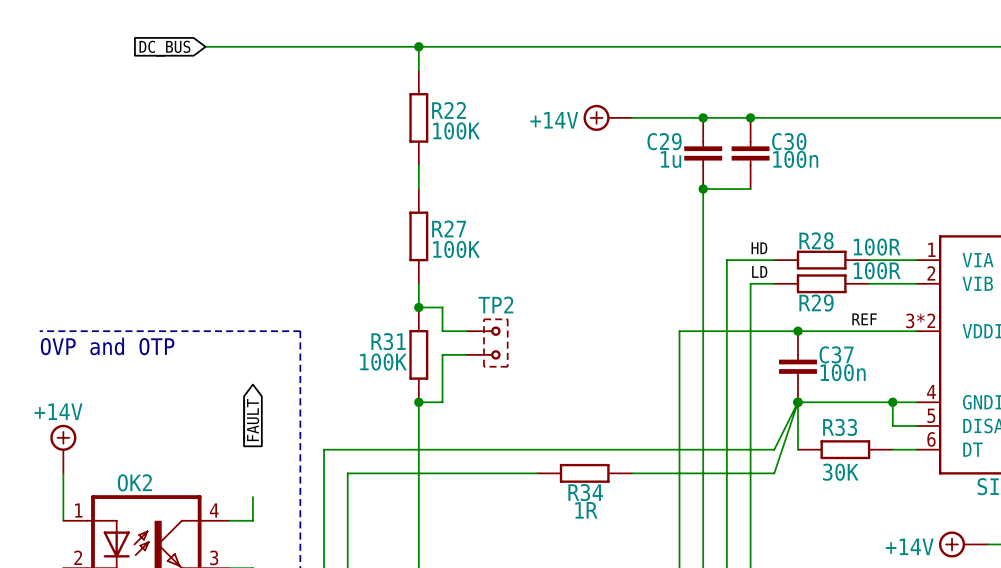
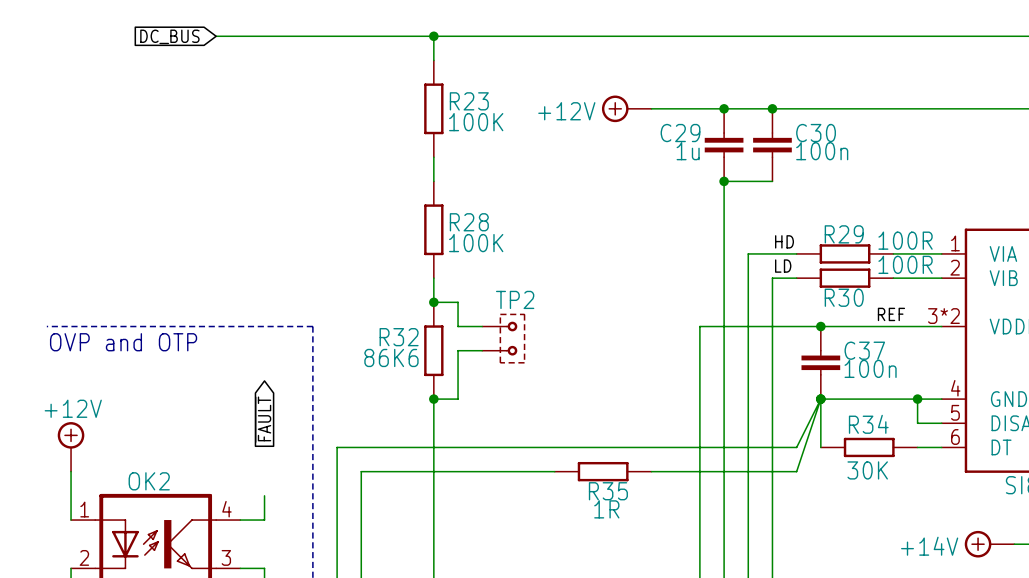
R22 name: R22 (449, 110) -> R23 (469, 101)
power symbol: +14V (607, 117) -> +12V (626, 108)
R27 name: R27 (449, 228) -> R28 (469, 222)
R28 name: R28 (816, 240) -> R29 (844, 234)
R29 name: R29 (816, 303) -> R30 (844, 297)
R31 name: R31 (388, 341) -> R32 (399, 337)
R31 value: 100K (383, 362) -> 86K6 (391, 357)
R33 name: R33 (840, 427) -> R34 (868, 424)
power symbol: +14V (63, 449) -> +12V (71, 446)
R34 name: R34 (585, 492) -> R35 (608, 491)

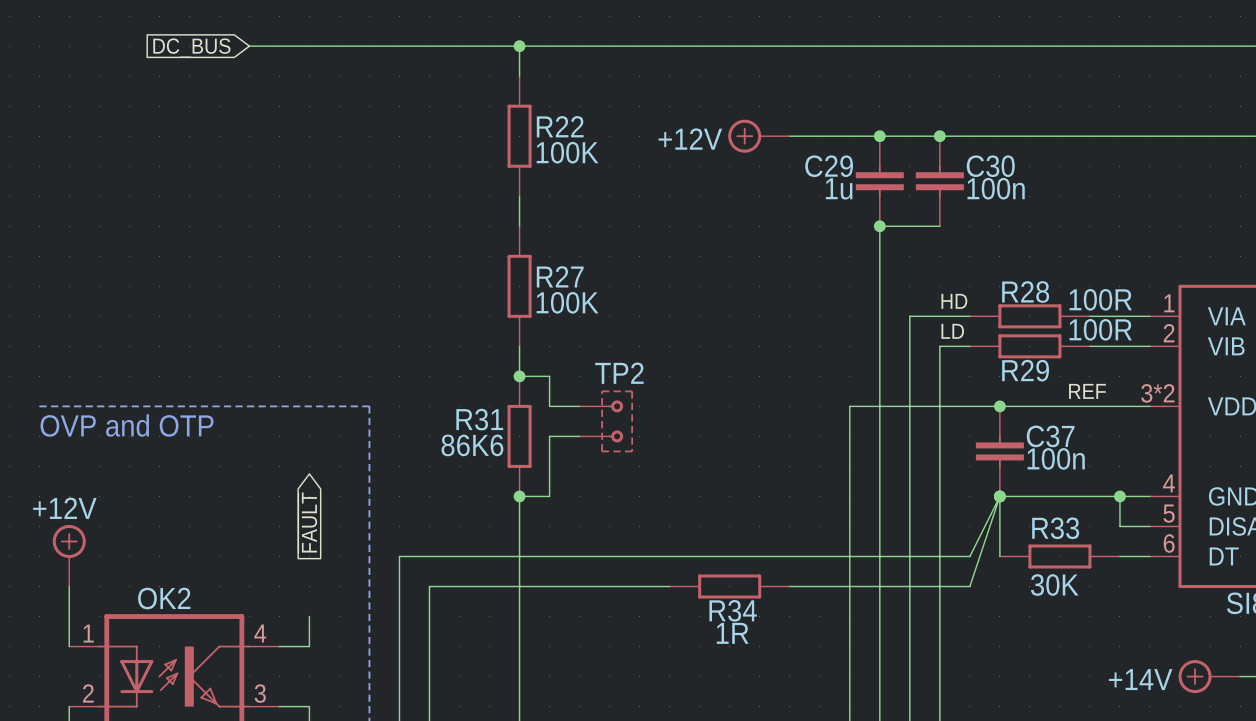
R23 name: R23 (469, 101) -> R22 (560, 126)
R28 name: R28 (469, 222) -> R27 (560, 276)
R29 name: R29 (844, 234) -> R28 (1025, 292)
R30 name: R30 (844, 297) -> R29 (1025, 370)
R32 name: R32 (399, 337) -> R31 (479, 419)
R34 name: R34 (868, 424) -> R33 (1055, 528)
R35 name: R35 (608, 491) -> R34 (733, 610)

